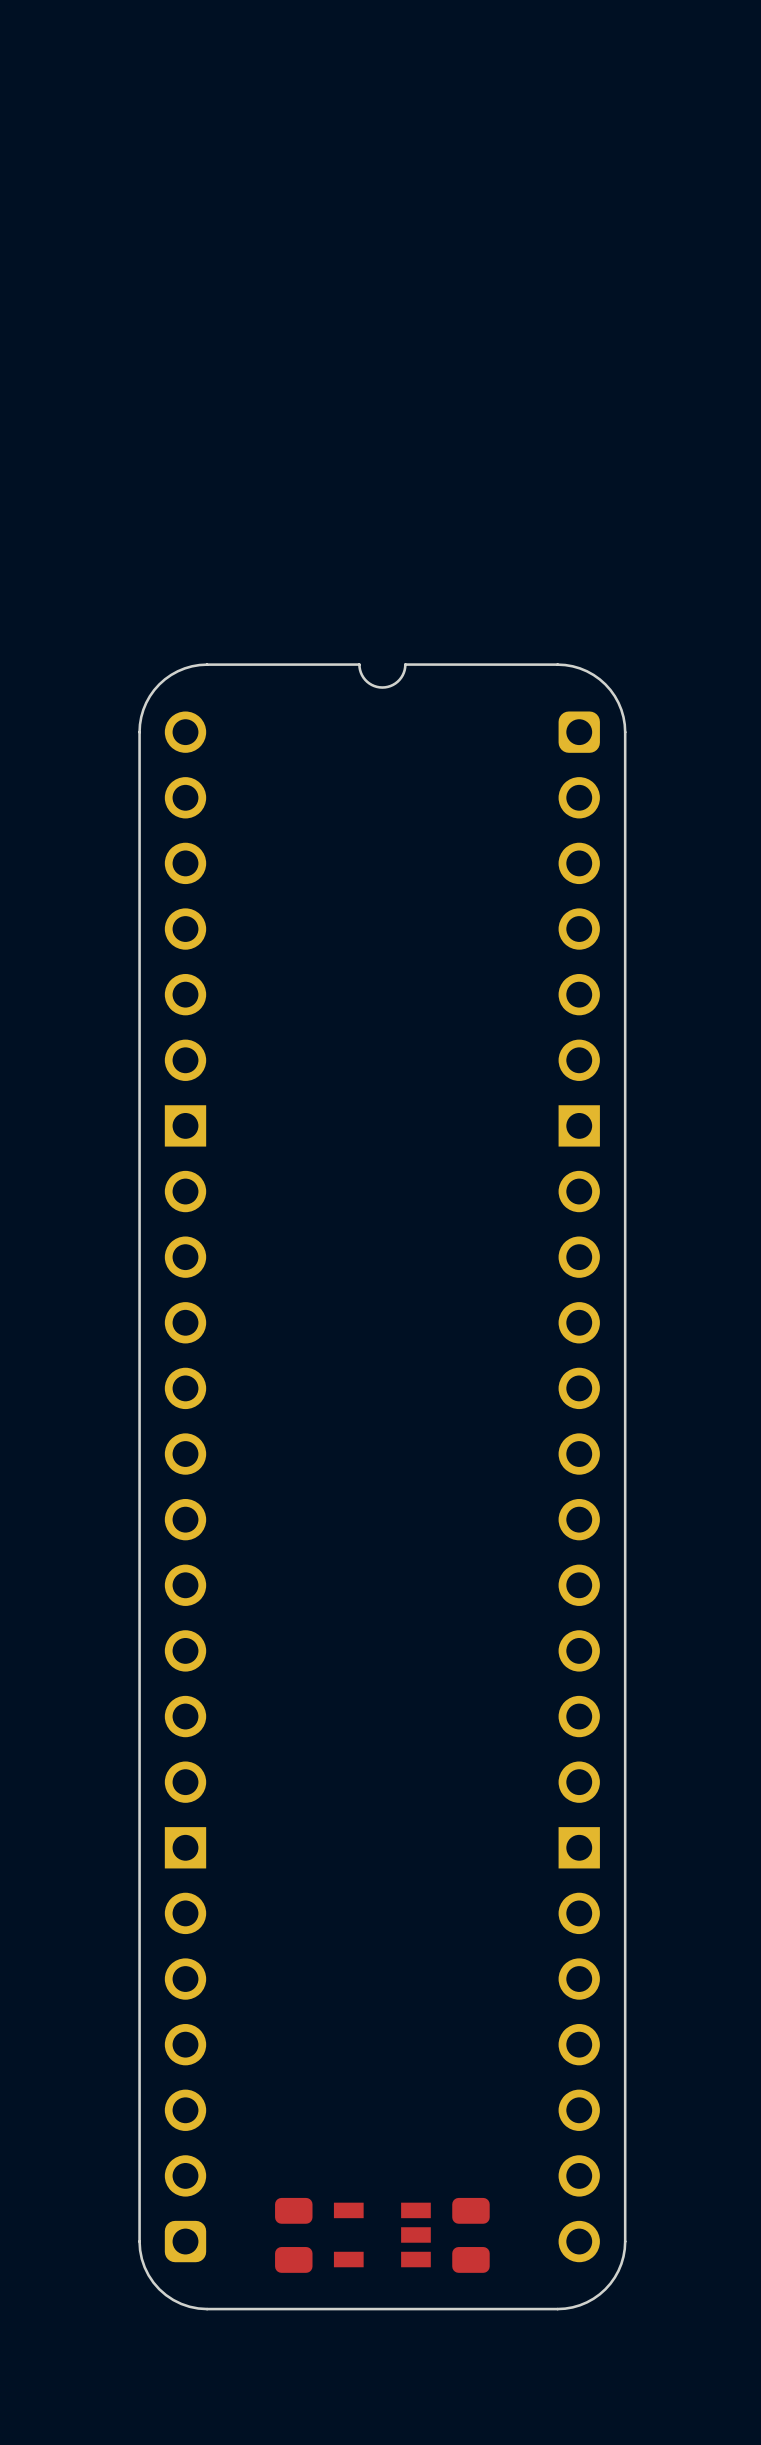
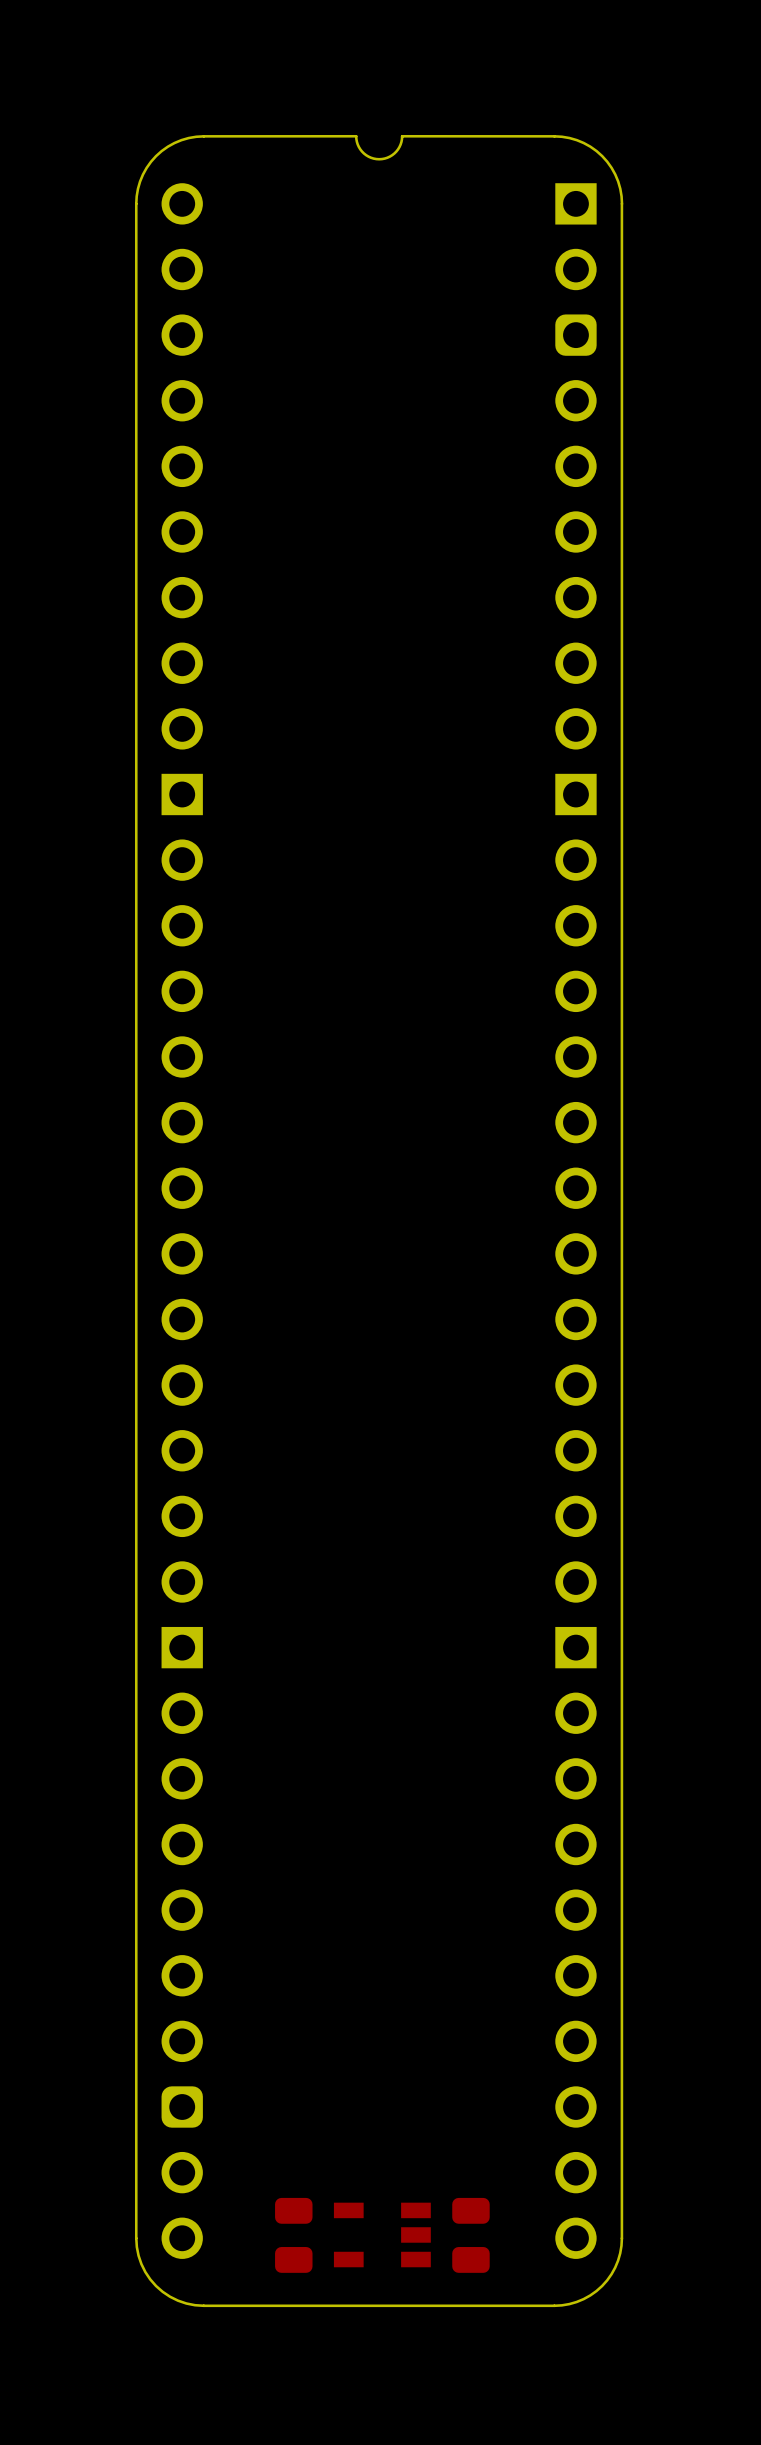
part: none -> (379, 1221)
part: (382, 1486) -> none

